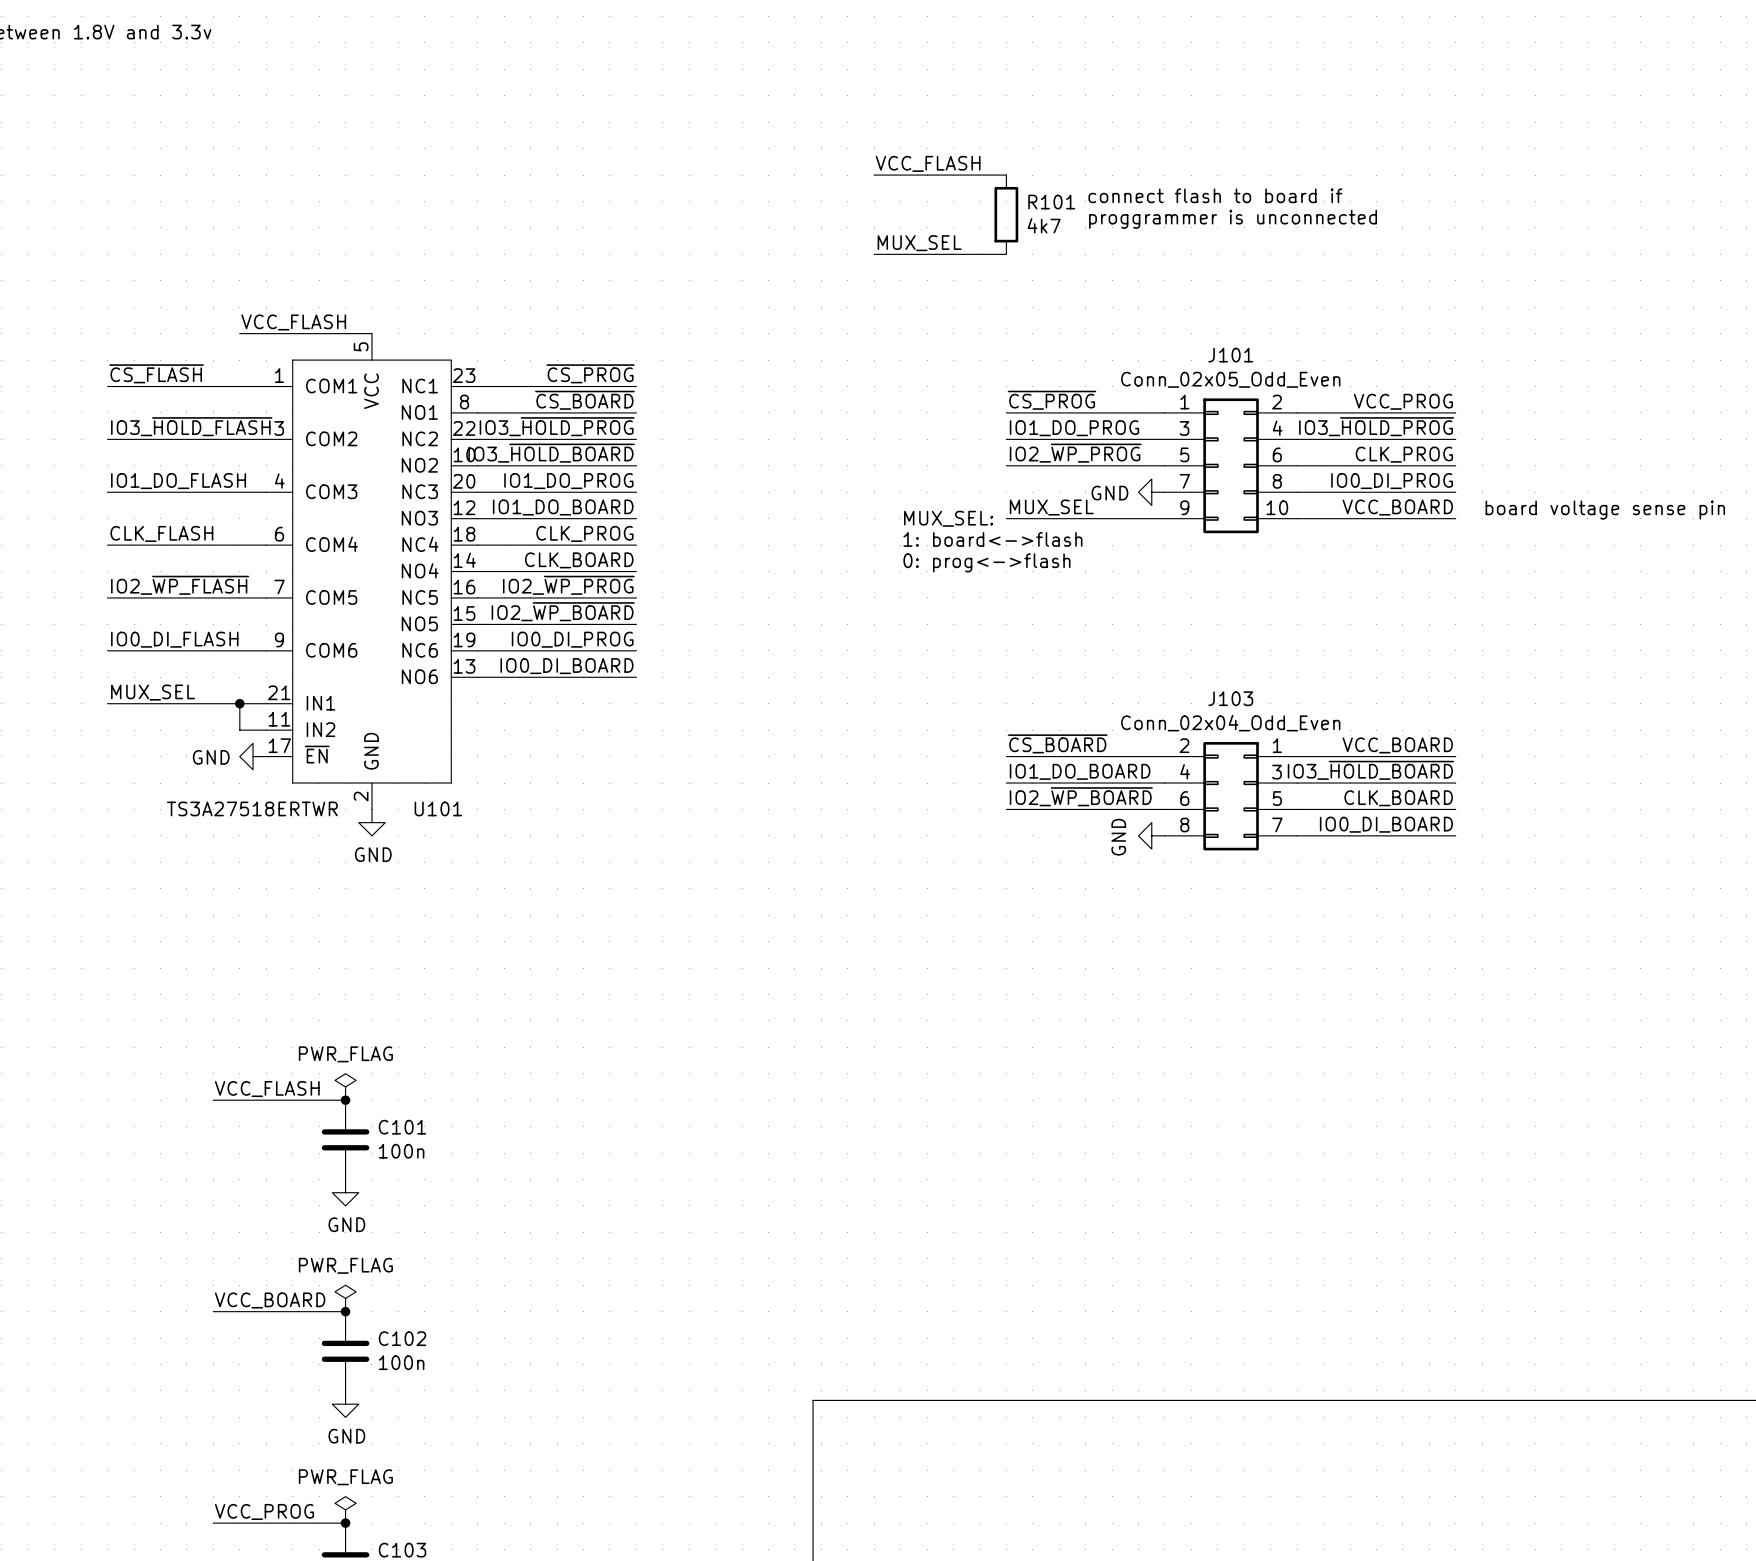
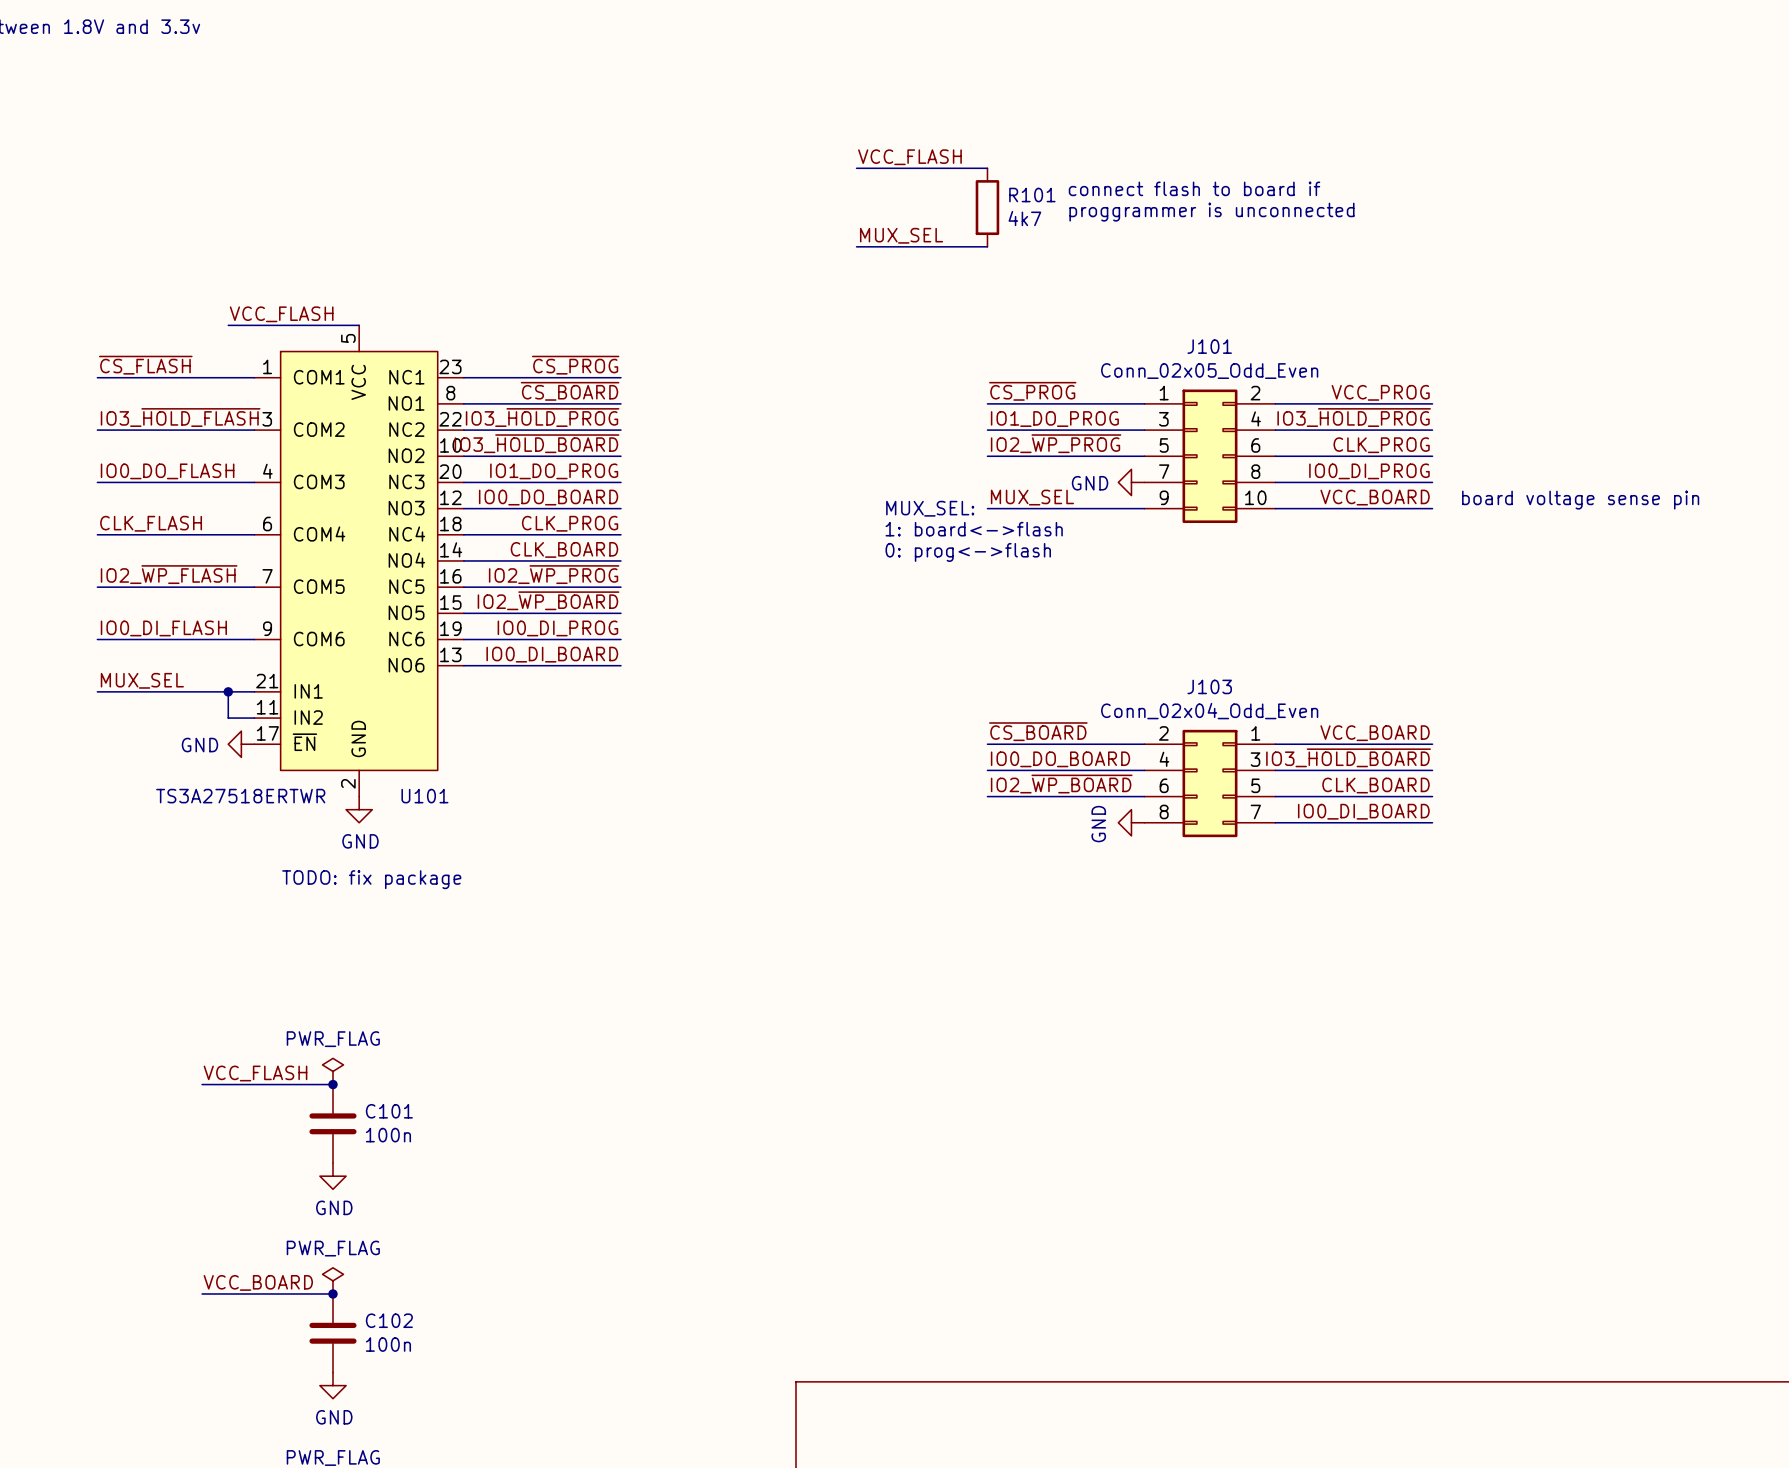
label: IO1_DO_FLASH (178, 481) -> IO0_DO_FLASH (167, 471)
label: IO1_DO_BOARD (563, 507) -> IO0_DO_BOARD (548, 497)
label: IO1_DO_BOARD (1080, 771) -> IO0_DO_BOARD (1060, 759)
text: none -> TODO: fix package (371, 879)

